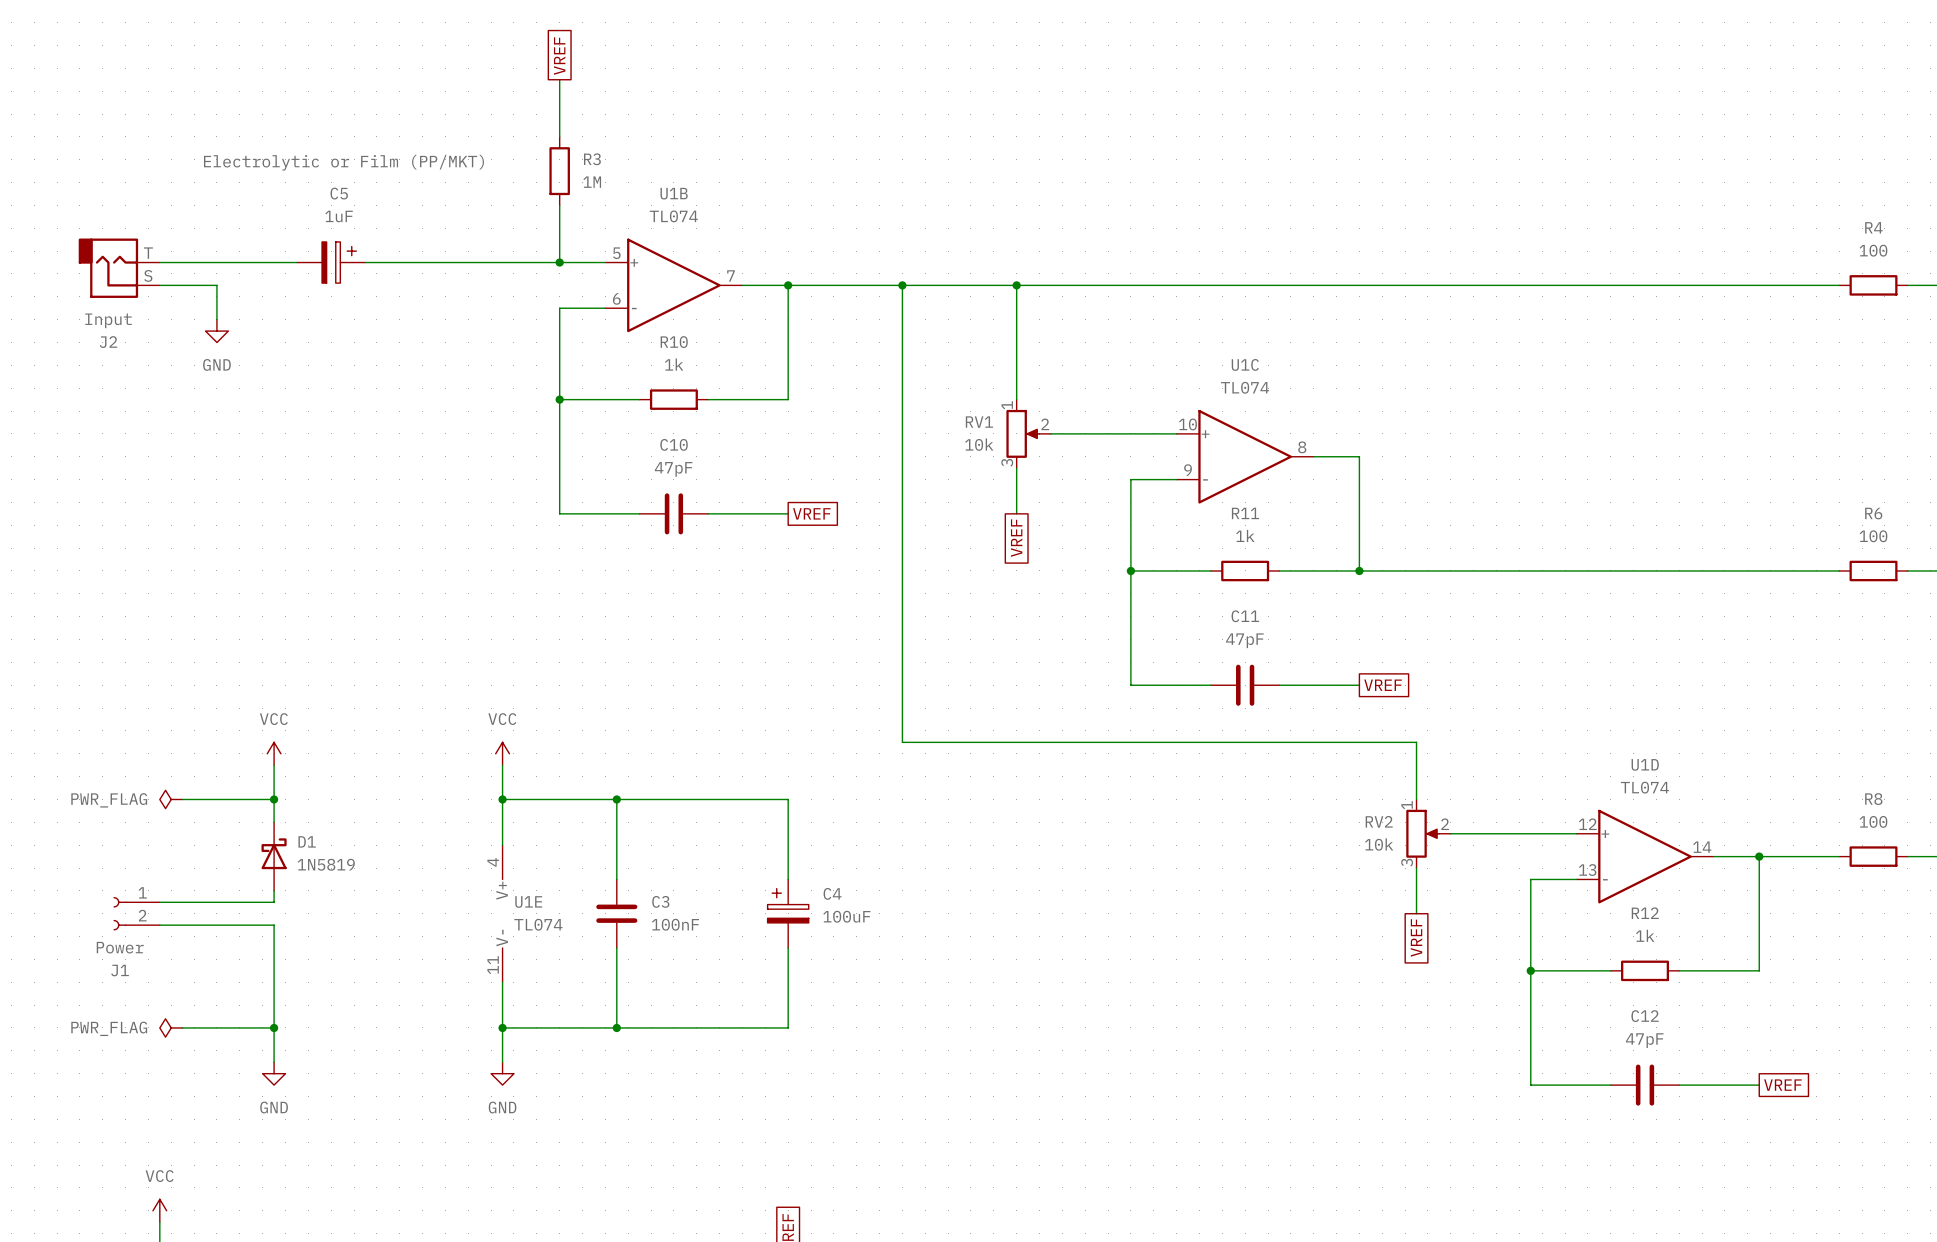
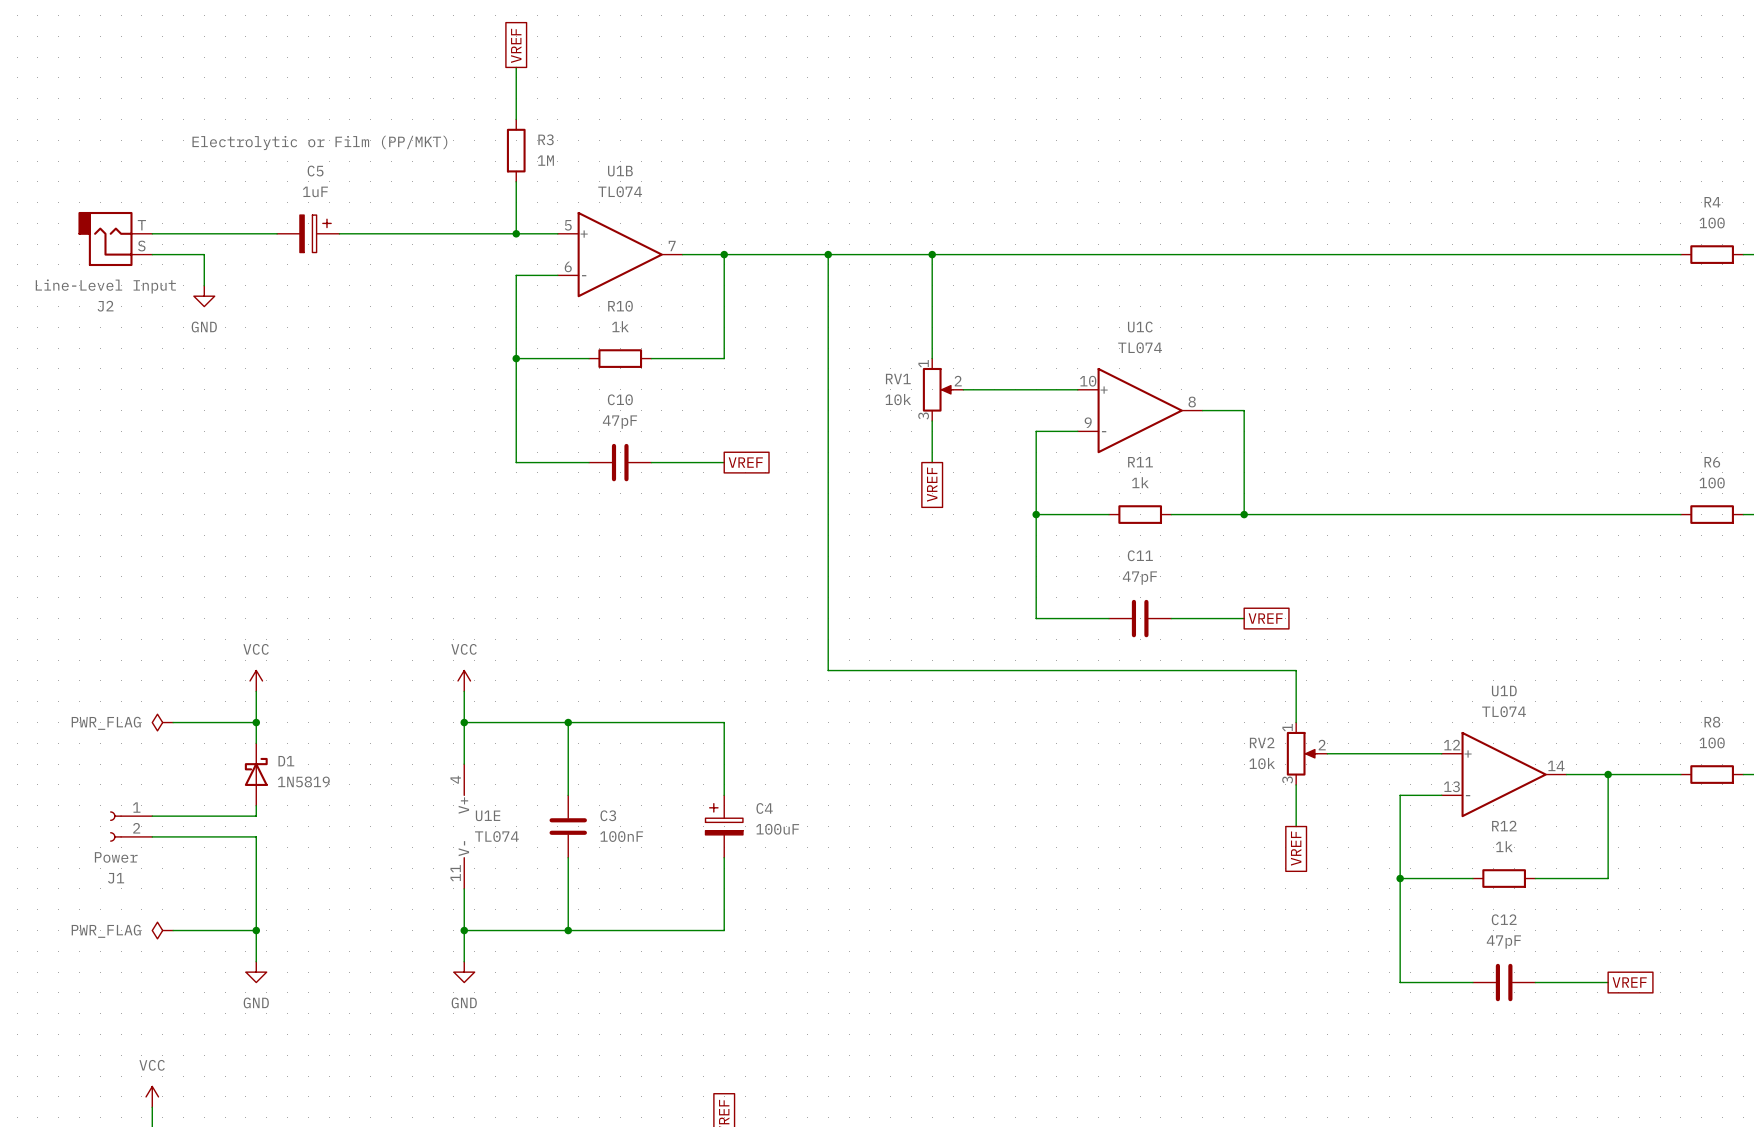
J2 value: Input (108, 320) -> Line-Level Input (105, 286)

